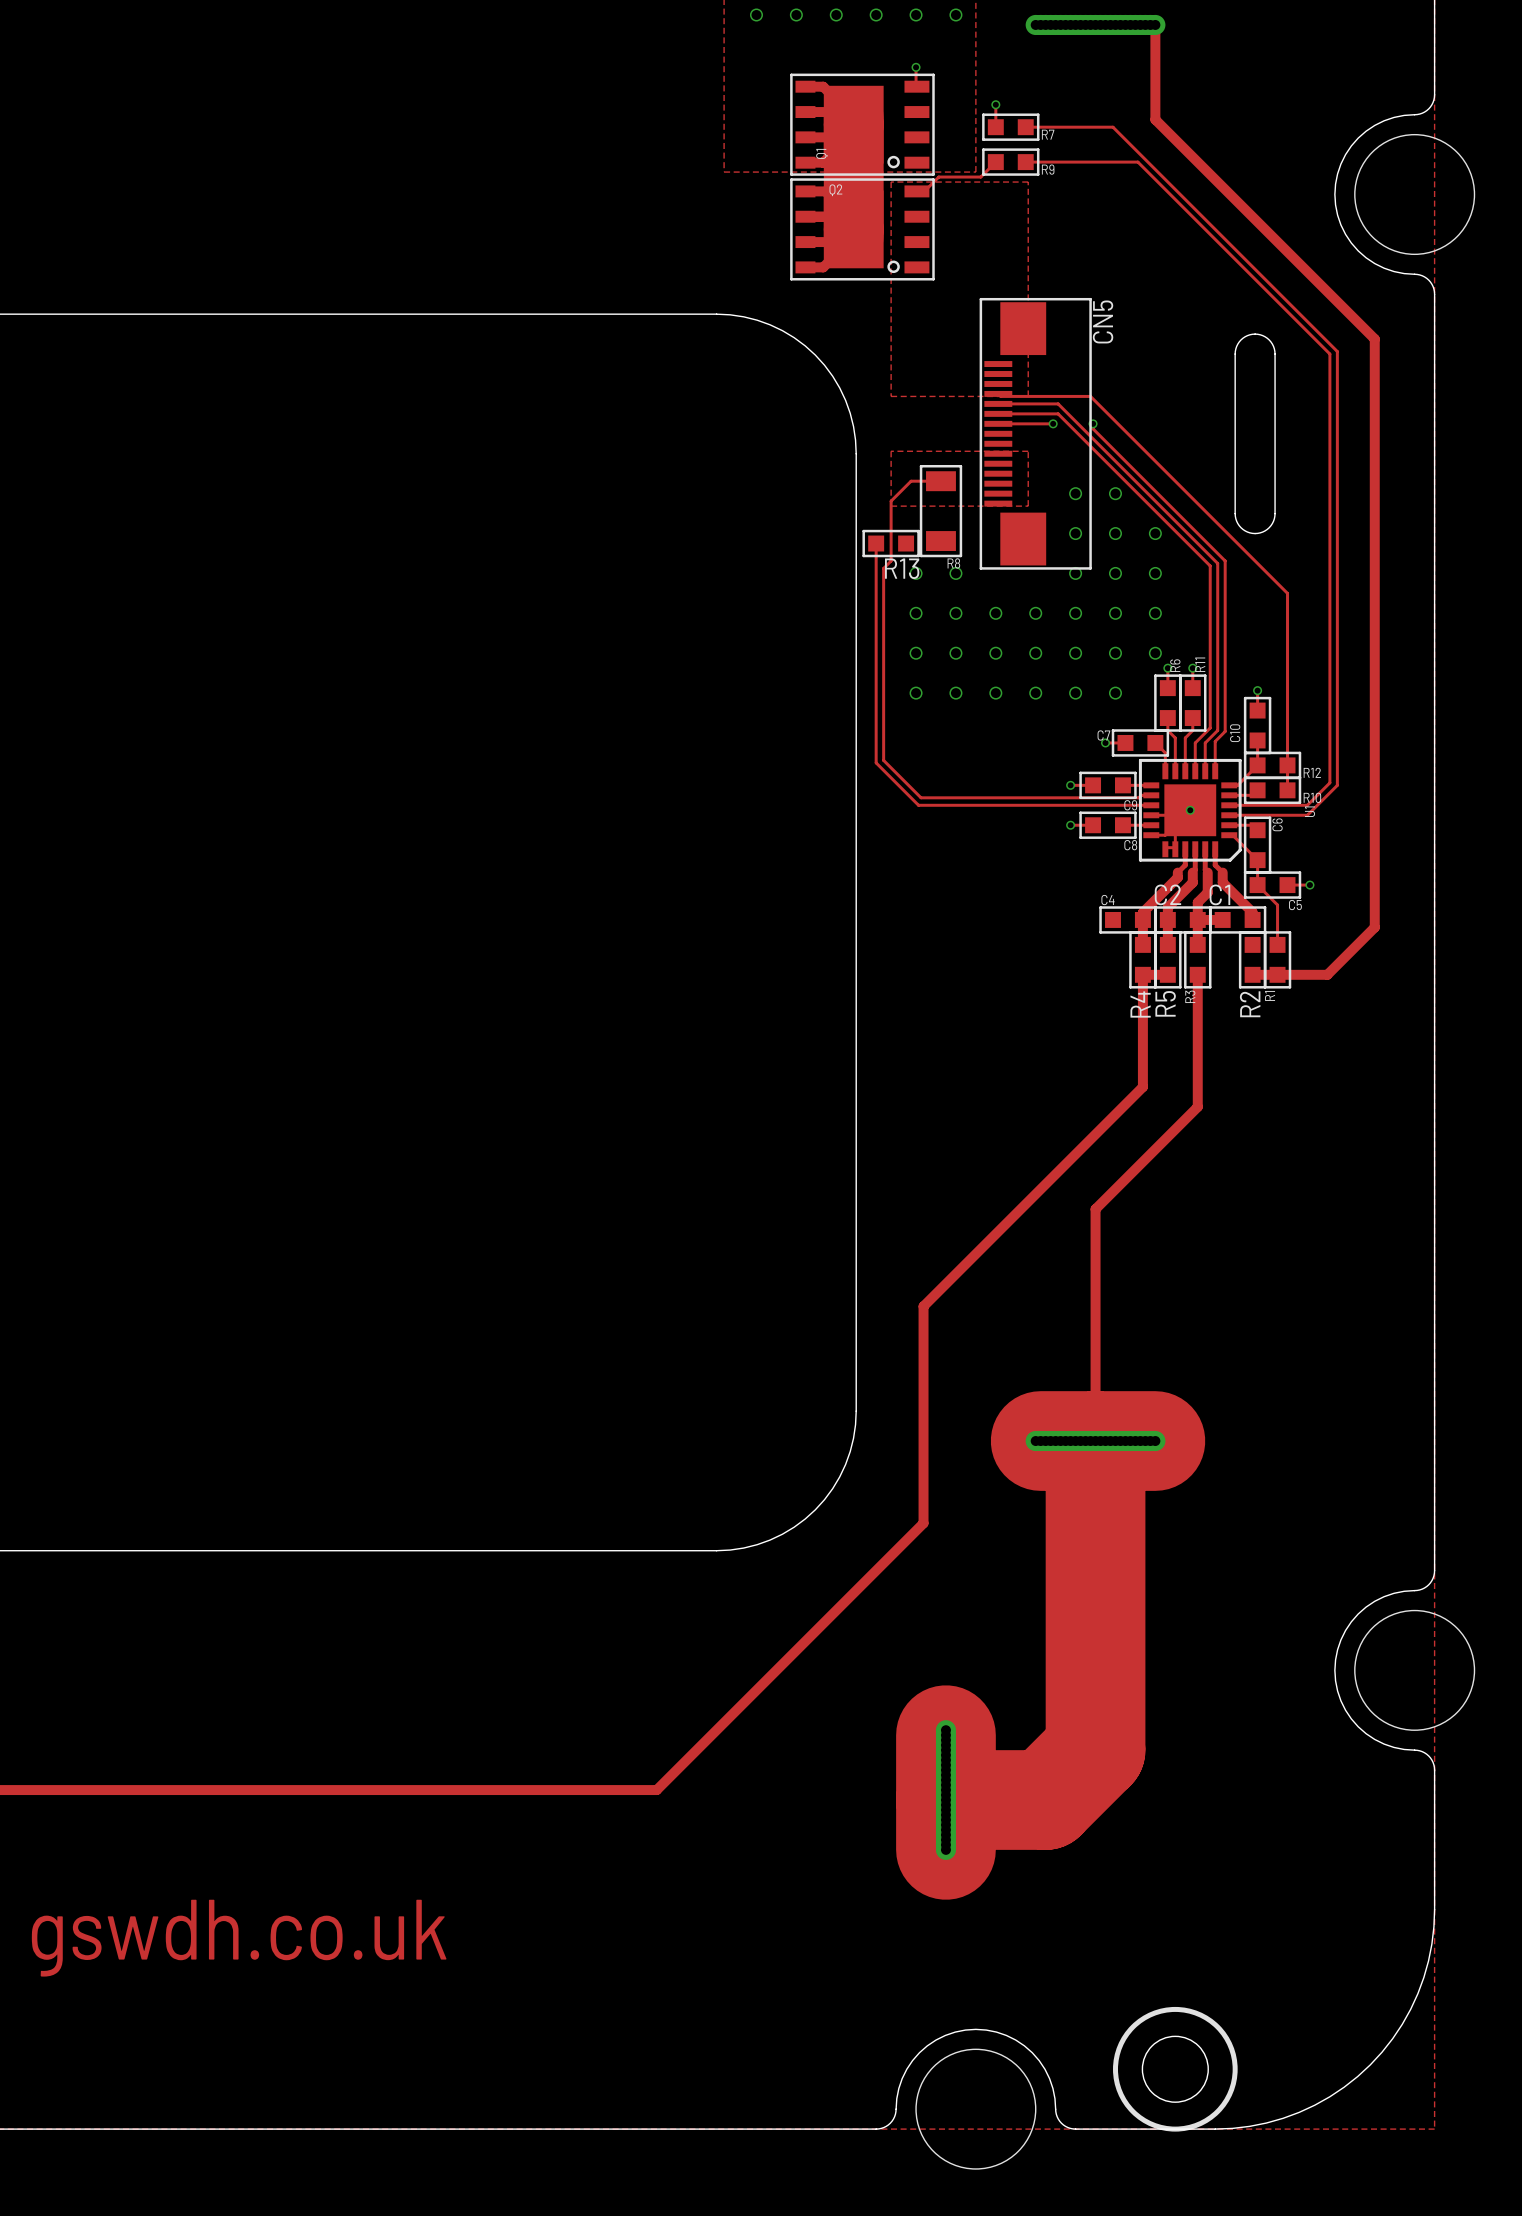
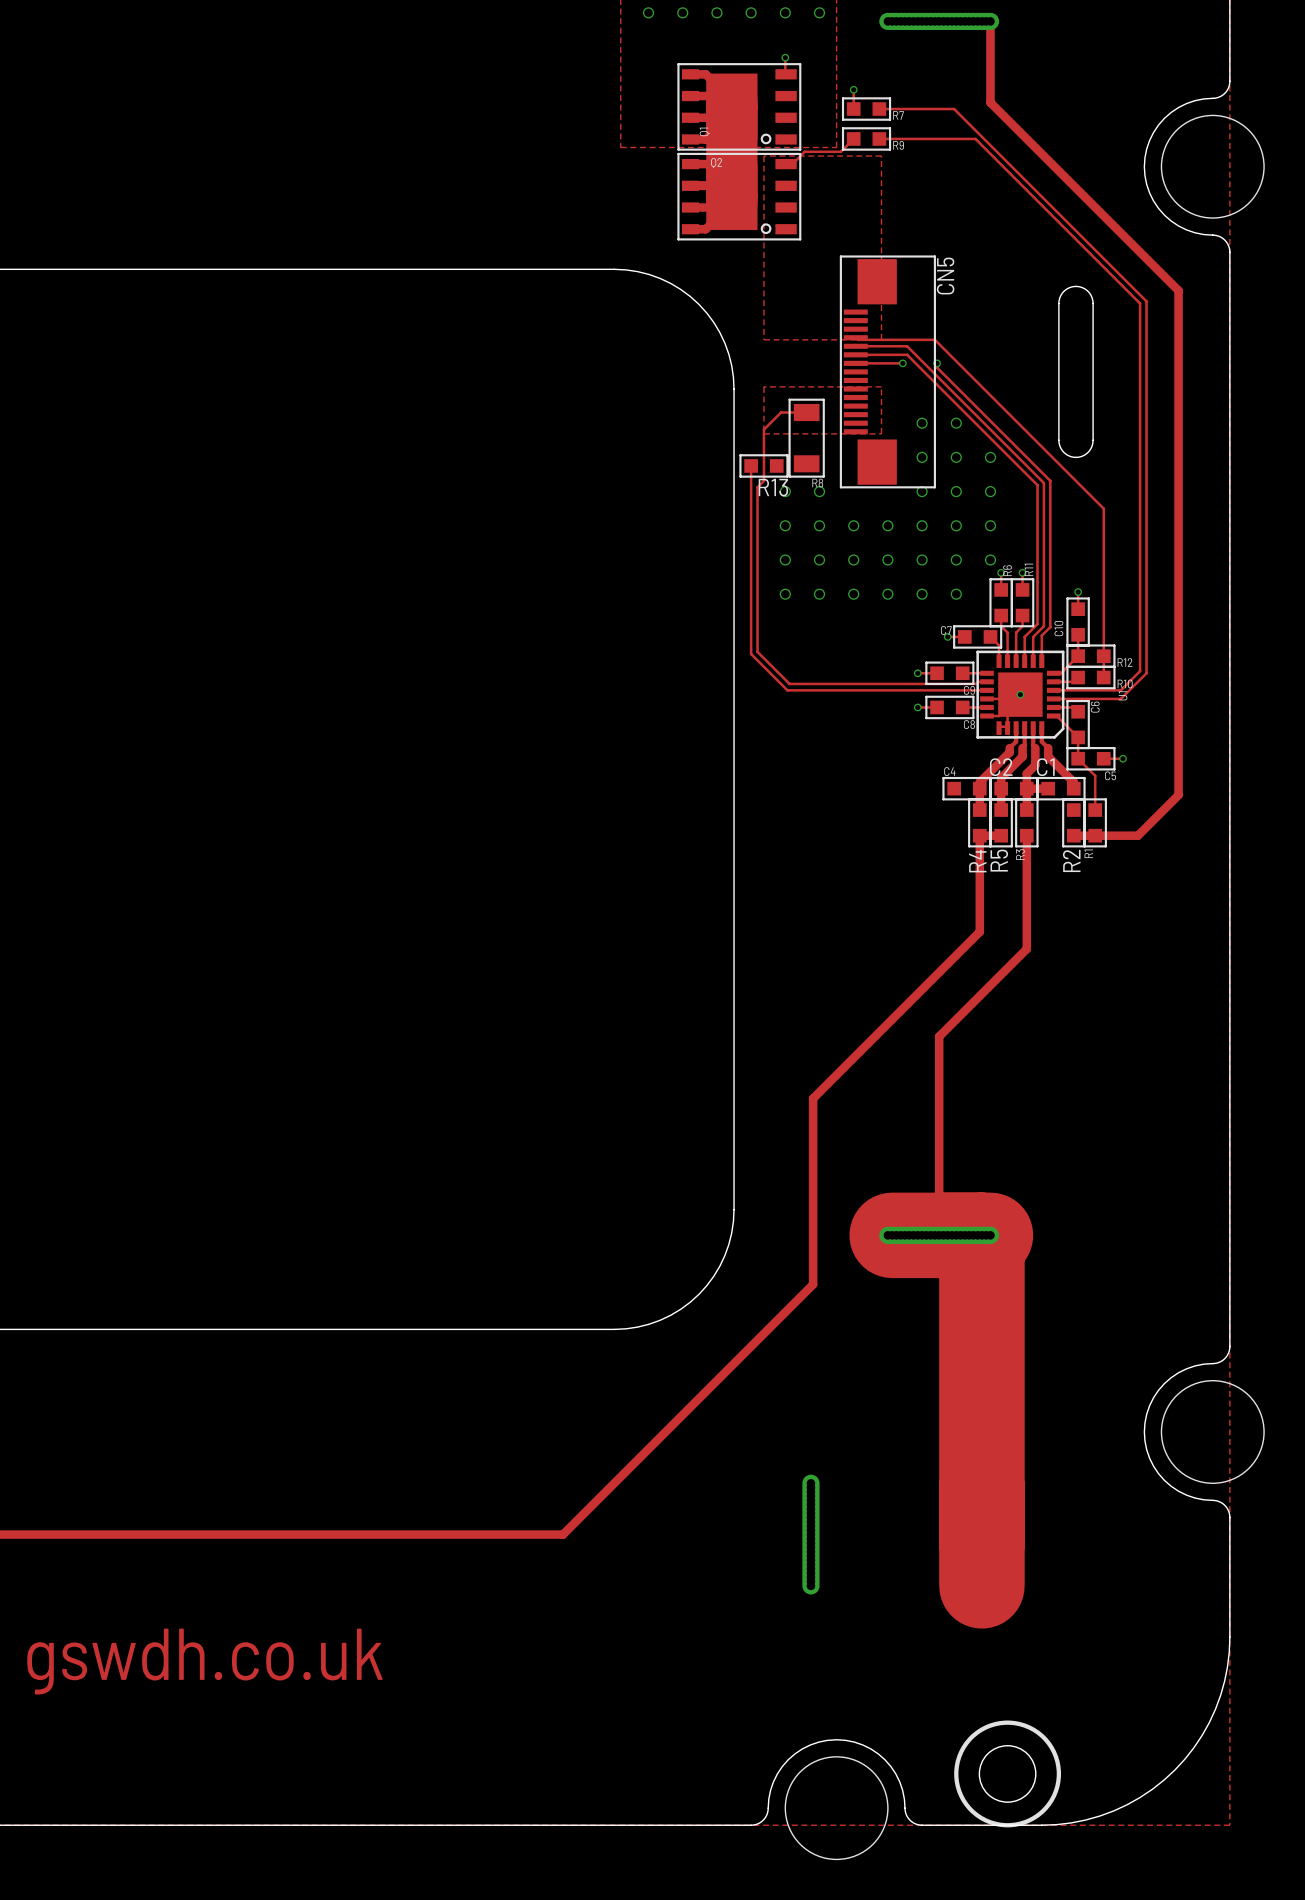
track: (948, 1281) (923, 1306) (923, 1523) -> (813, 1098) (813, 1284) (791, 1305)
track: (1095, 1441) (1095, 1750) (1045, 1800) (945, 1800) -> none
track: none -> (981, 1235) (981, 1585)
track: (945, 1735) (945, 1849) -> none

